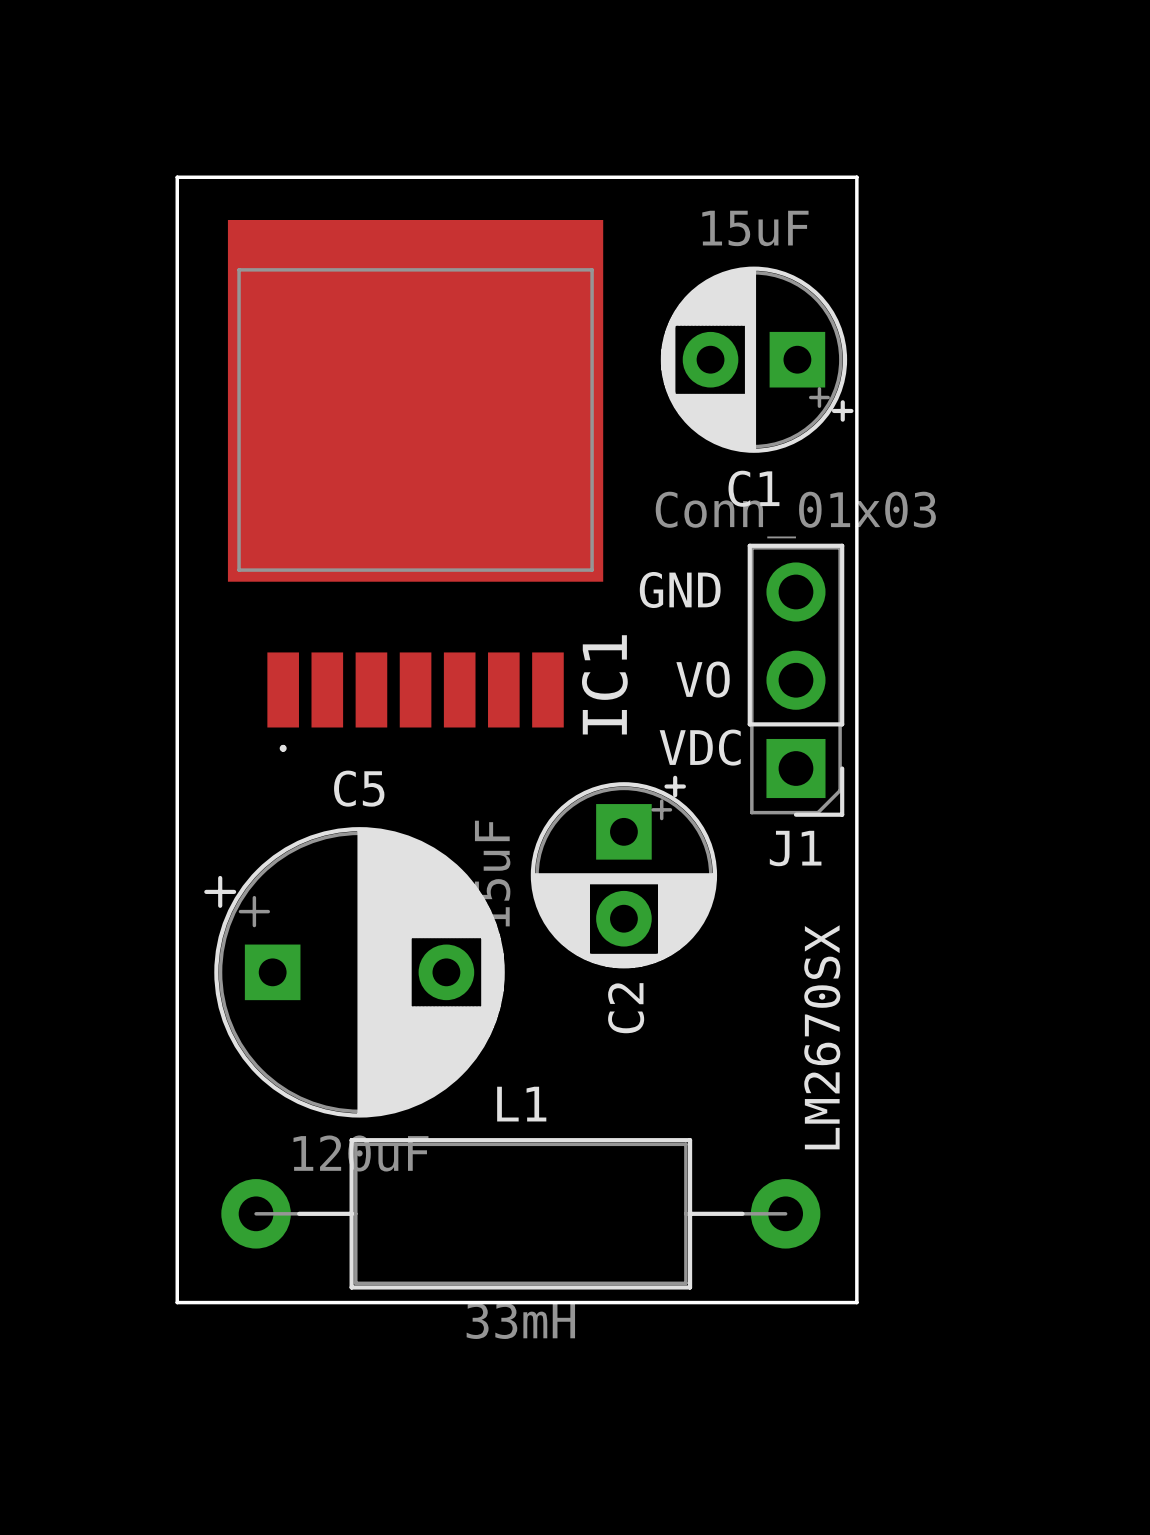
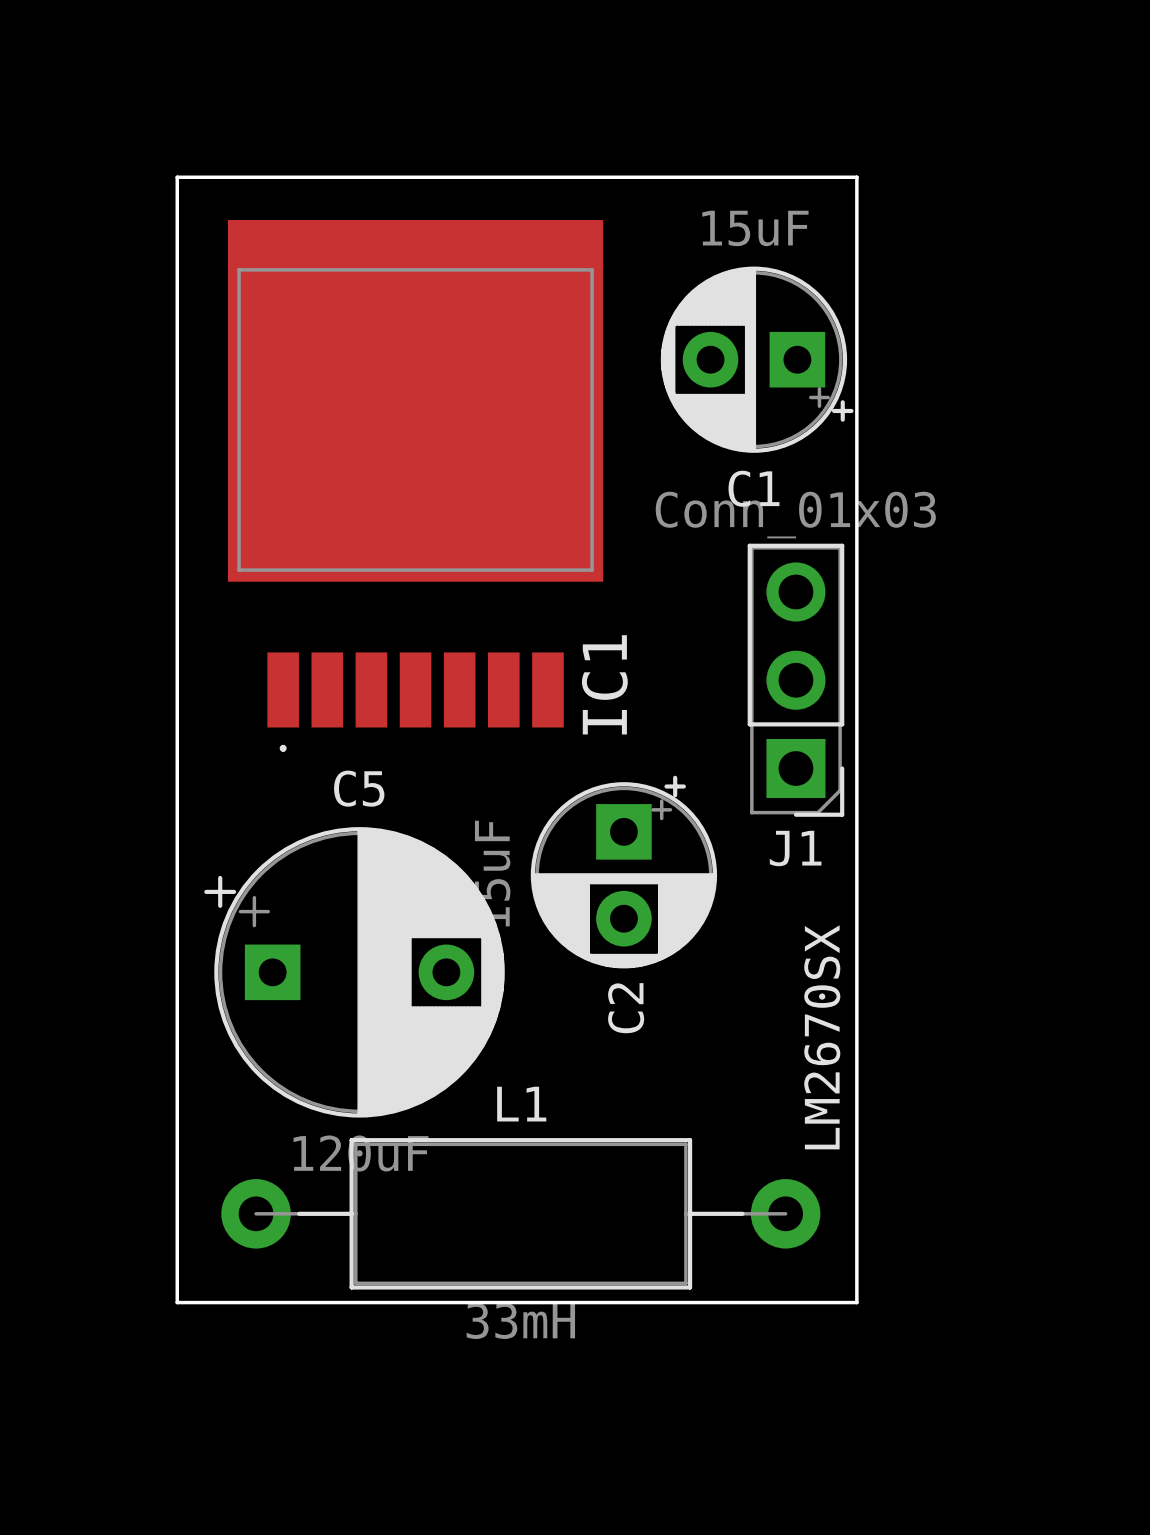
text: GND (680, 589) -> none
text: VO (703, 679) -> none
text: VDC (700, 747) -> none

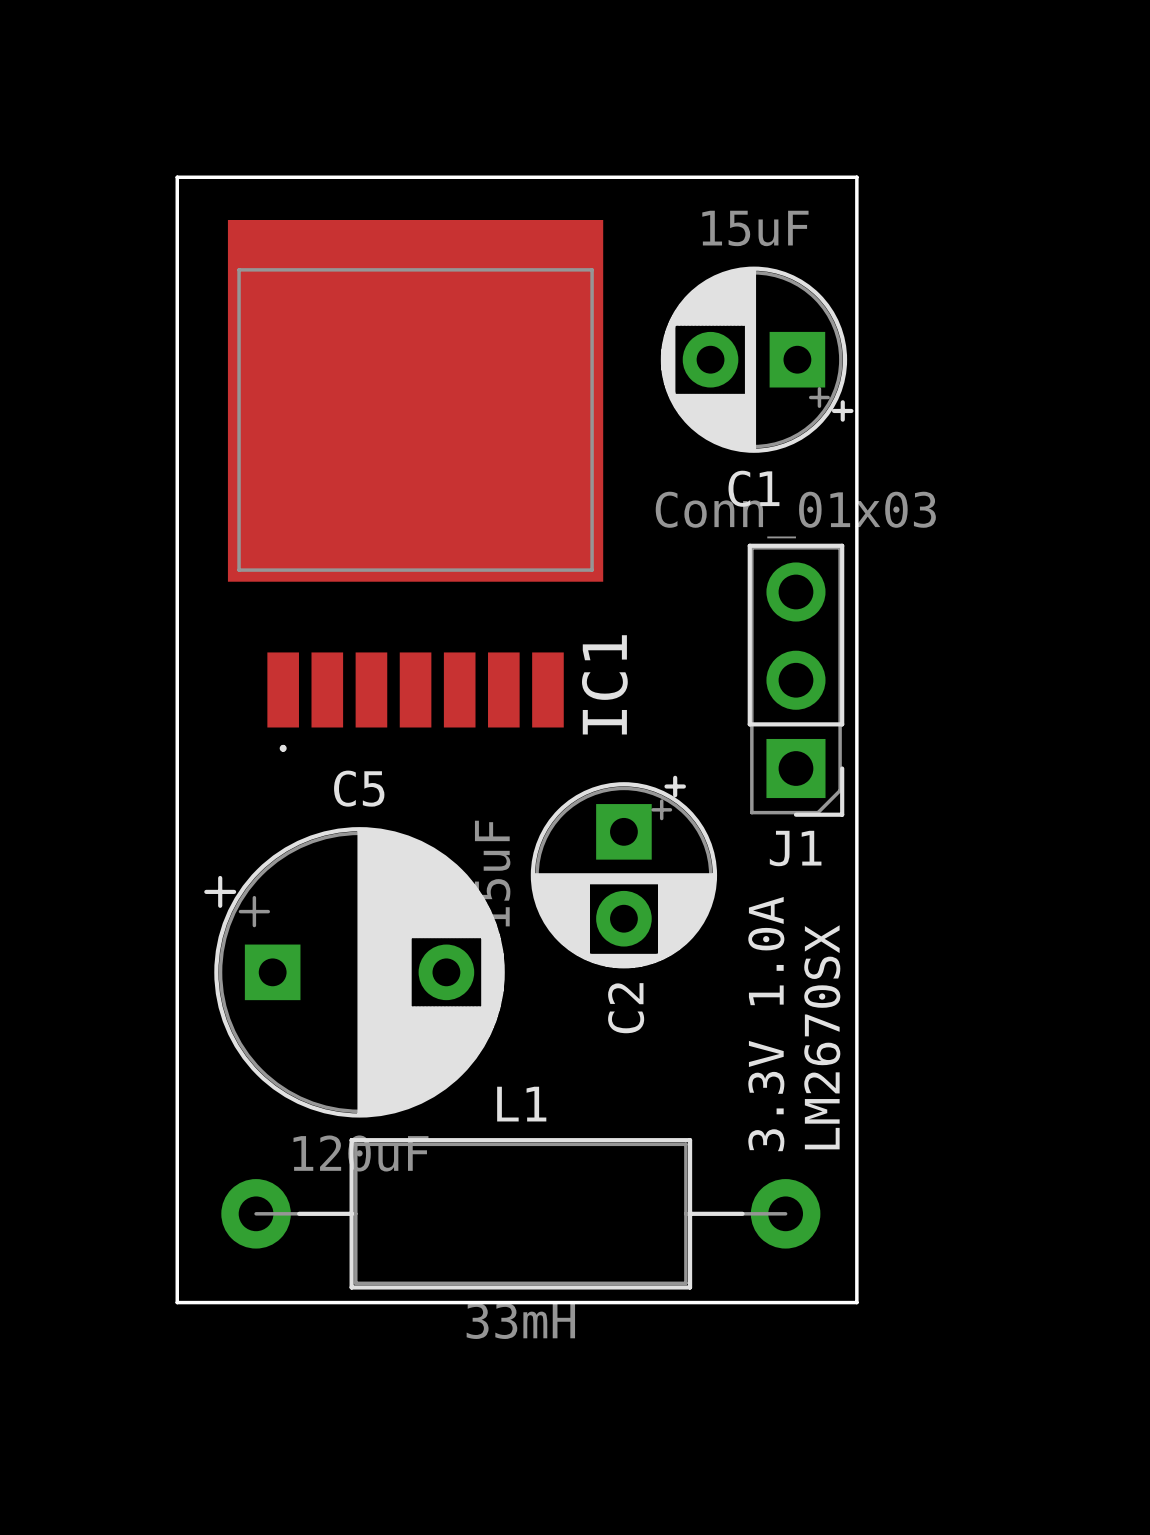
text: none -> 3.3V 1.0A (766, 1024)

